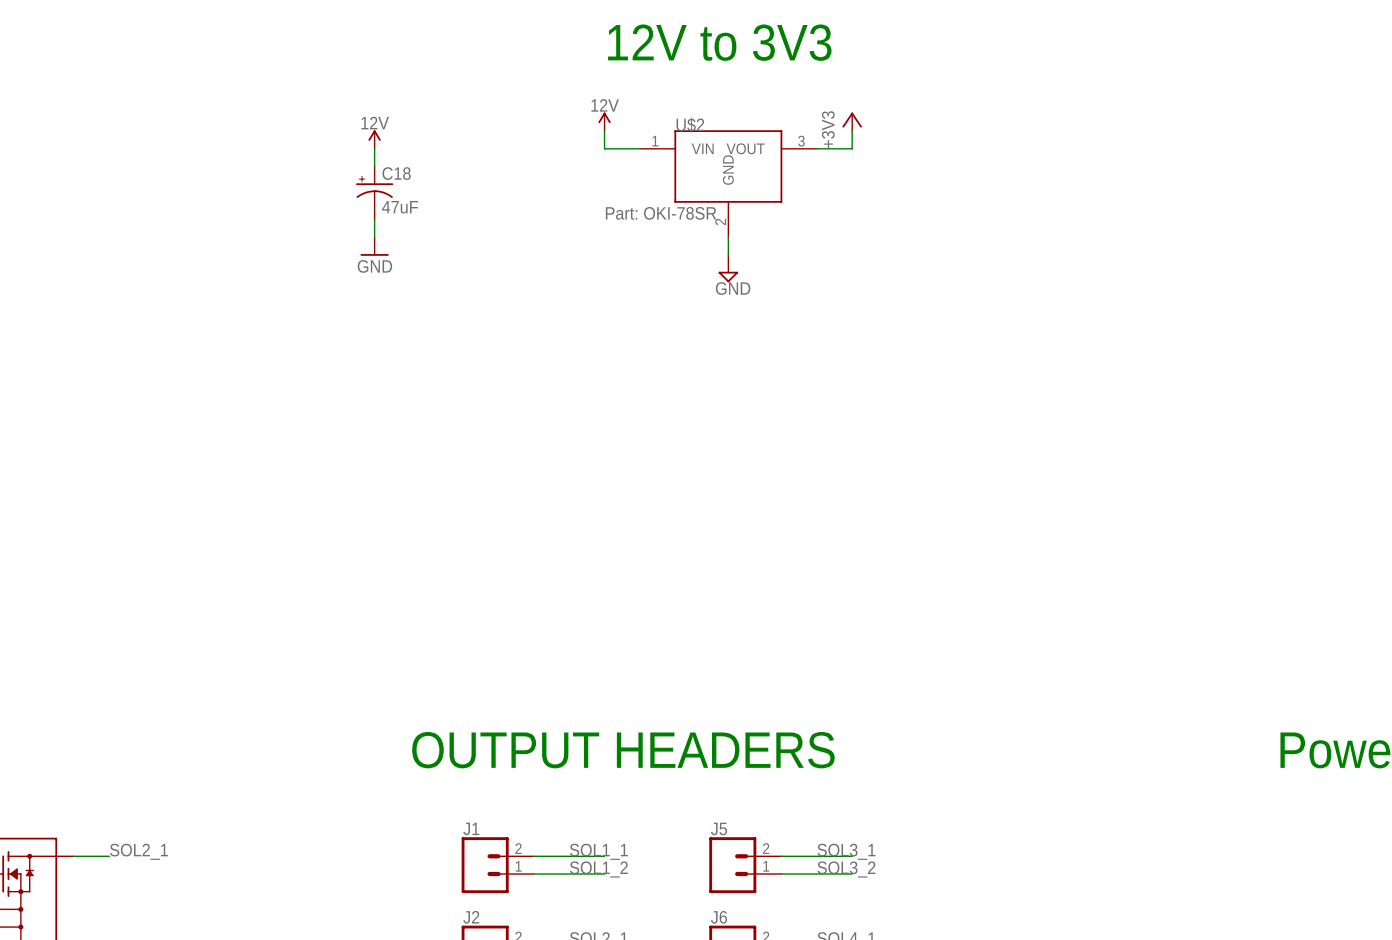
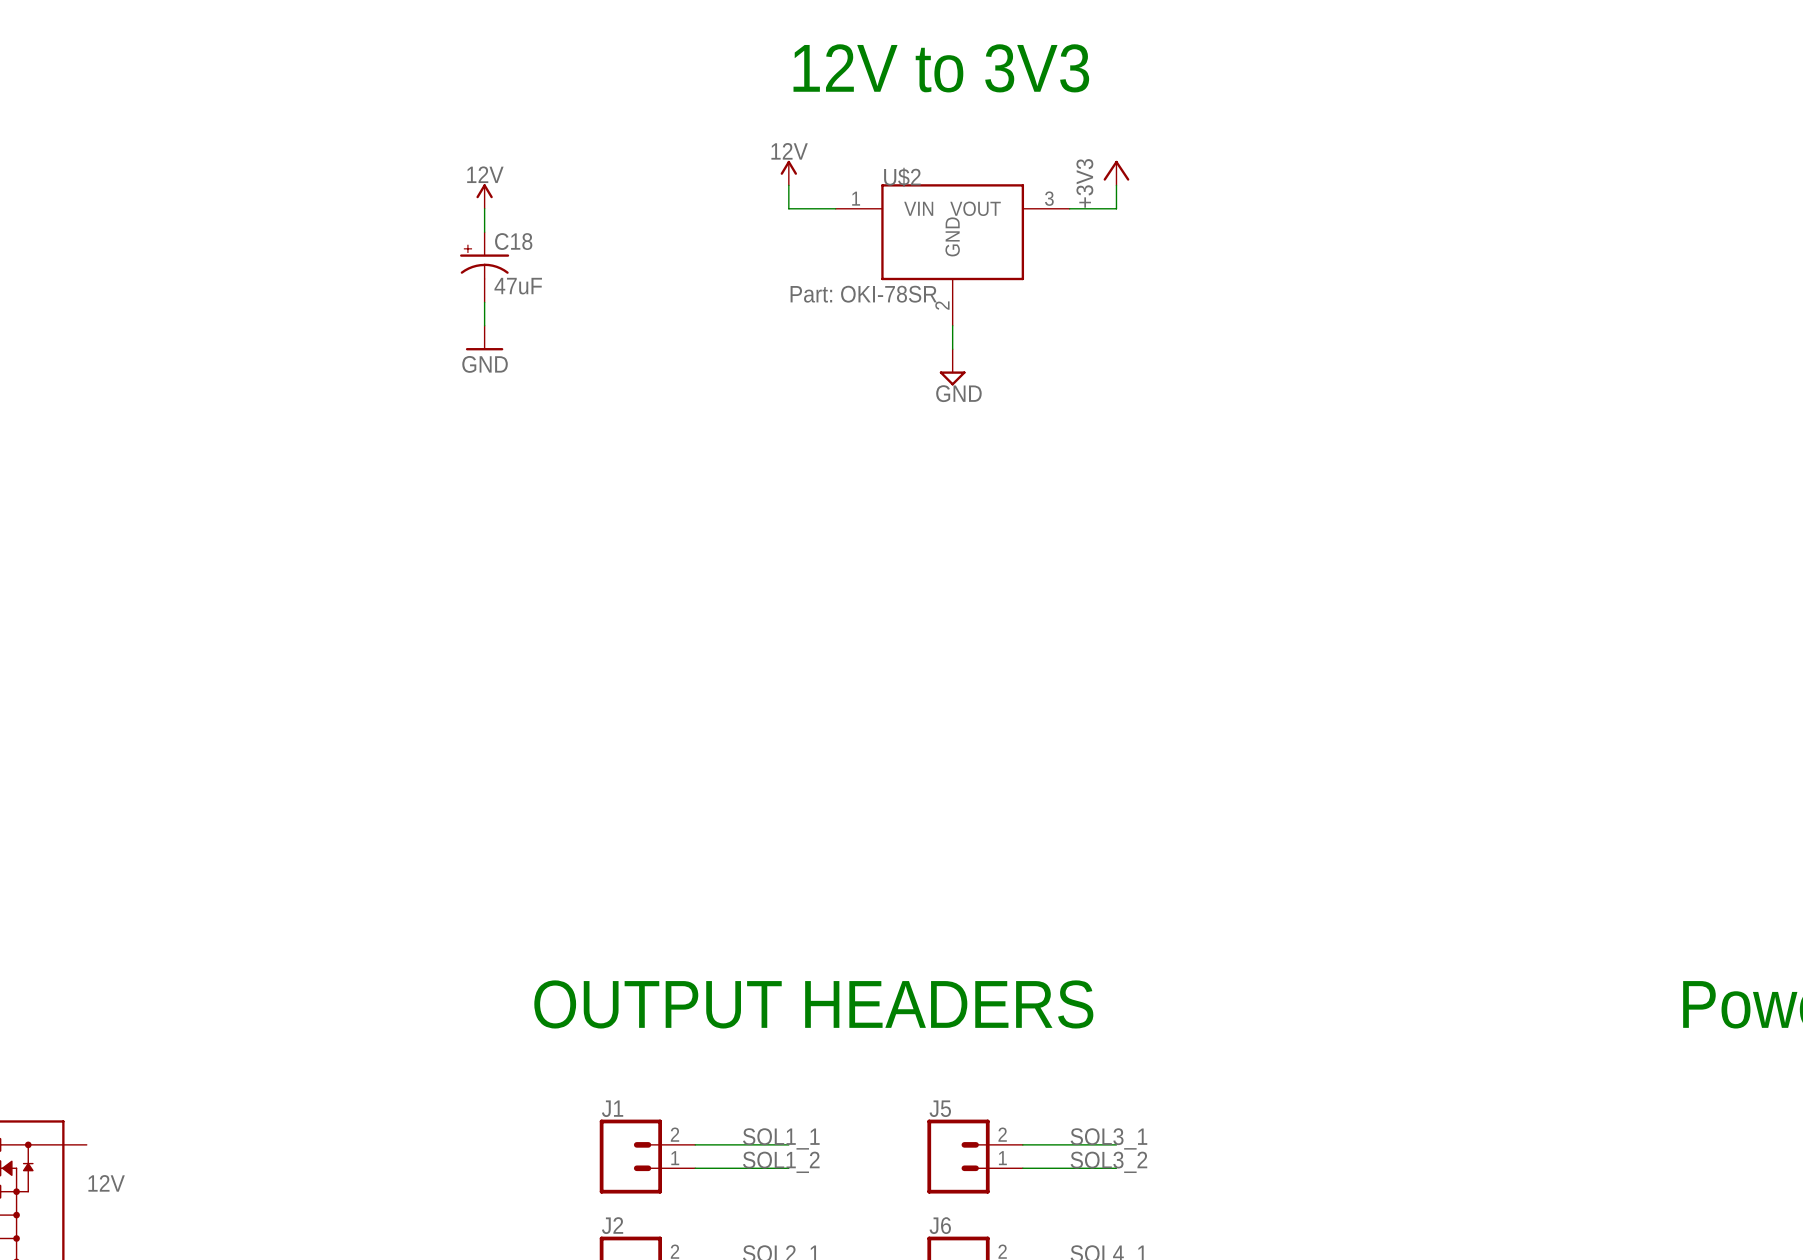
label: SOL2_1 (138, 851) -> none
wire: (73, 856) (109, 856) -> none
label: none -> 12V (106, 1183)

